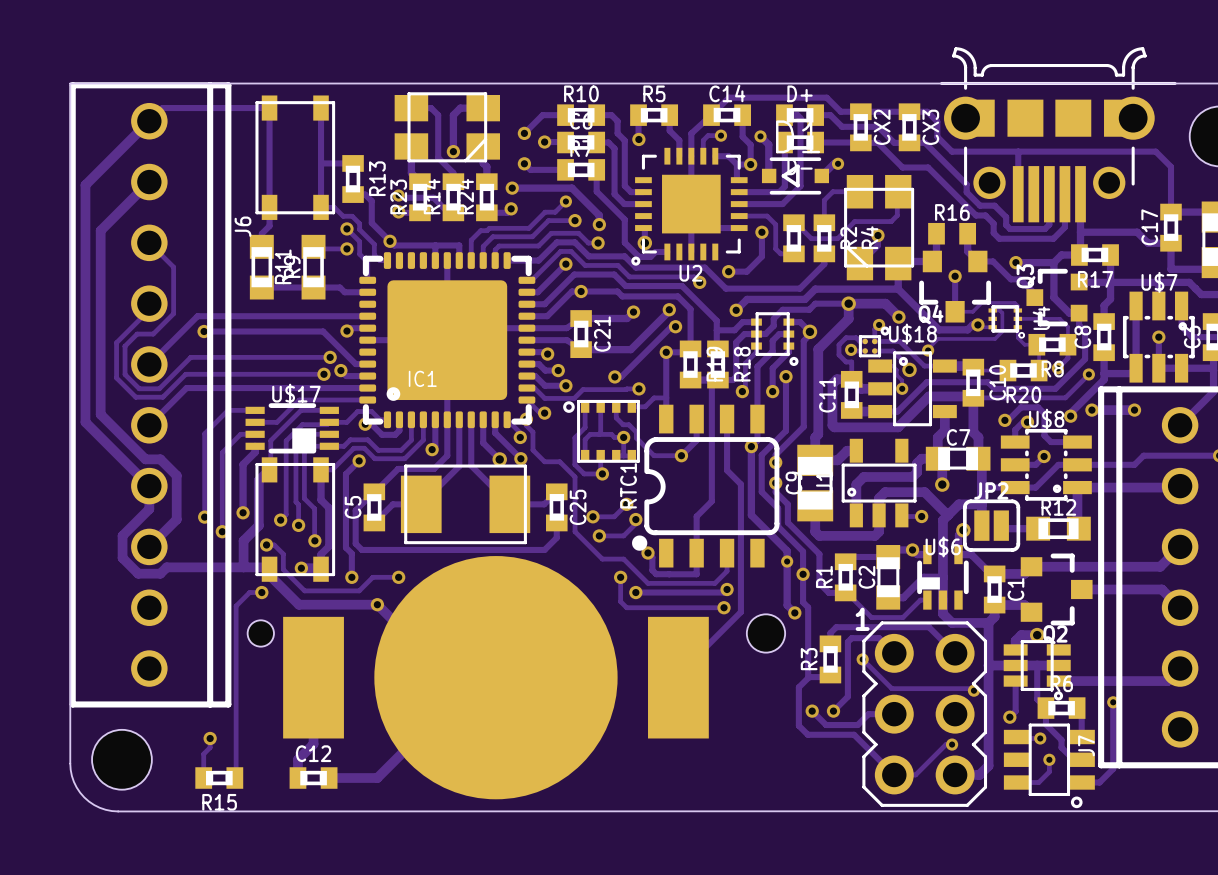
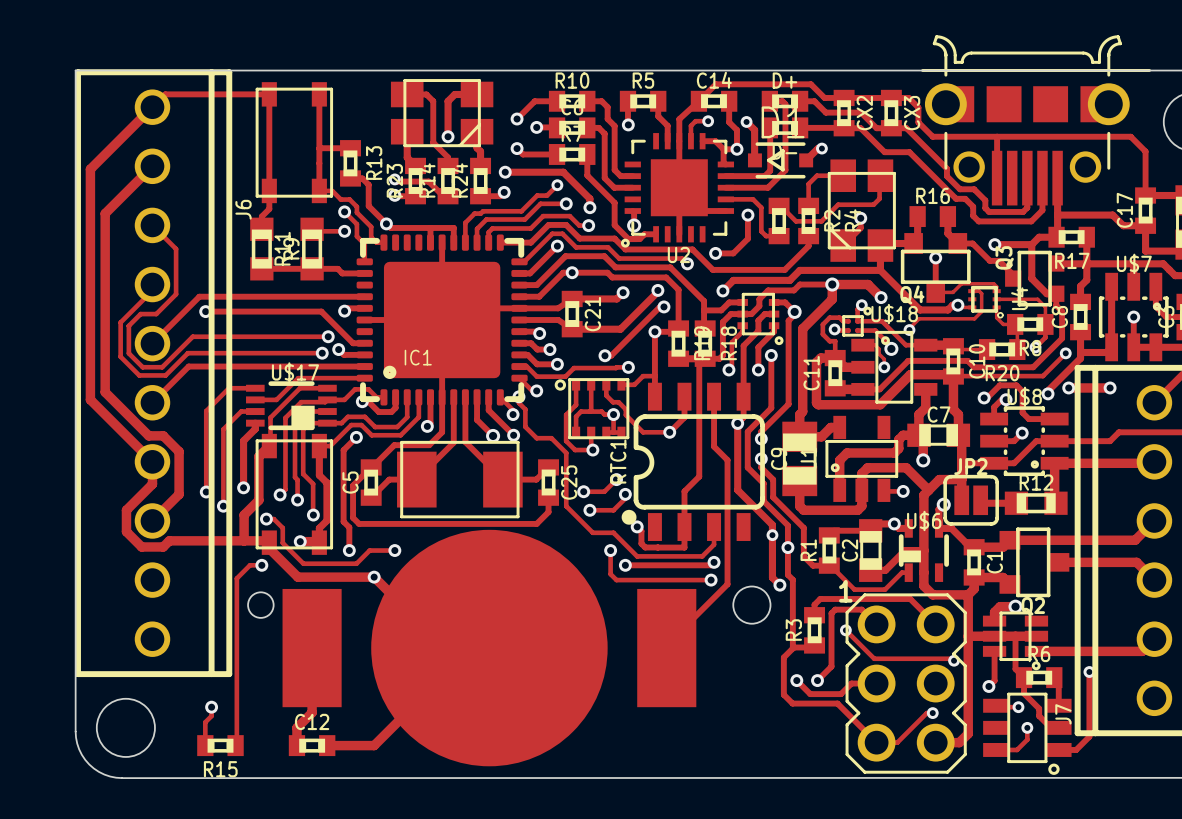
Q4 footprint: [919, 250, 992, 323] -> [900, 233, 971, 303]
Q3 footprint: [1026, 268, 1088, 327] -> [1005, 250, 1065, 307]
Q2 footprint: [1020, 553, 1093, 626] -> [999, 527, 1070, 598]

